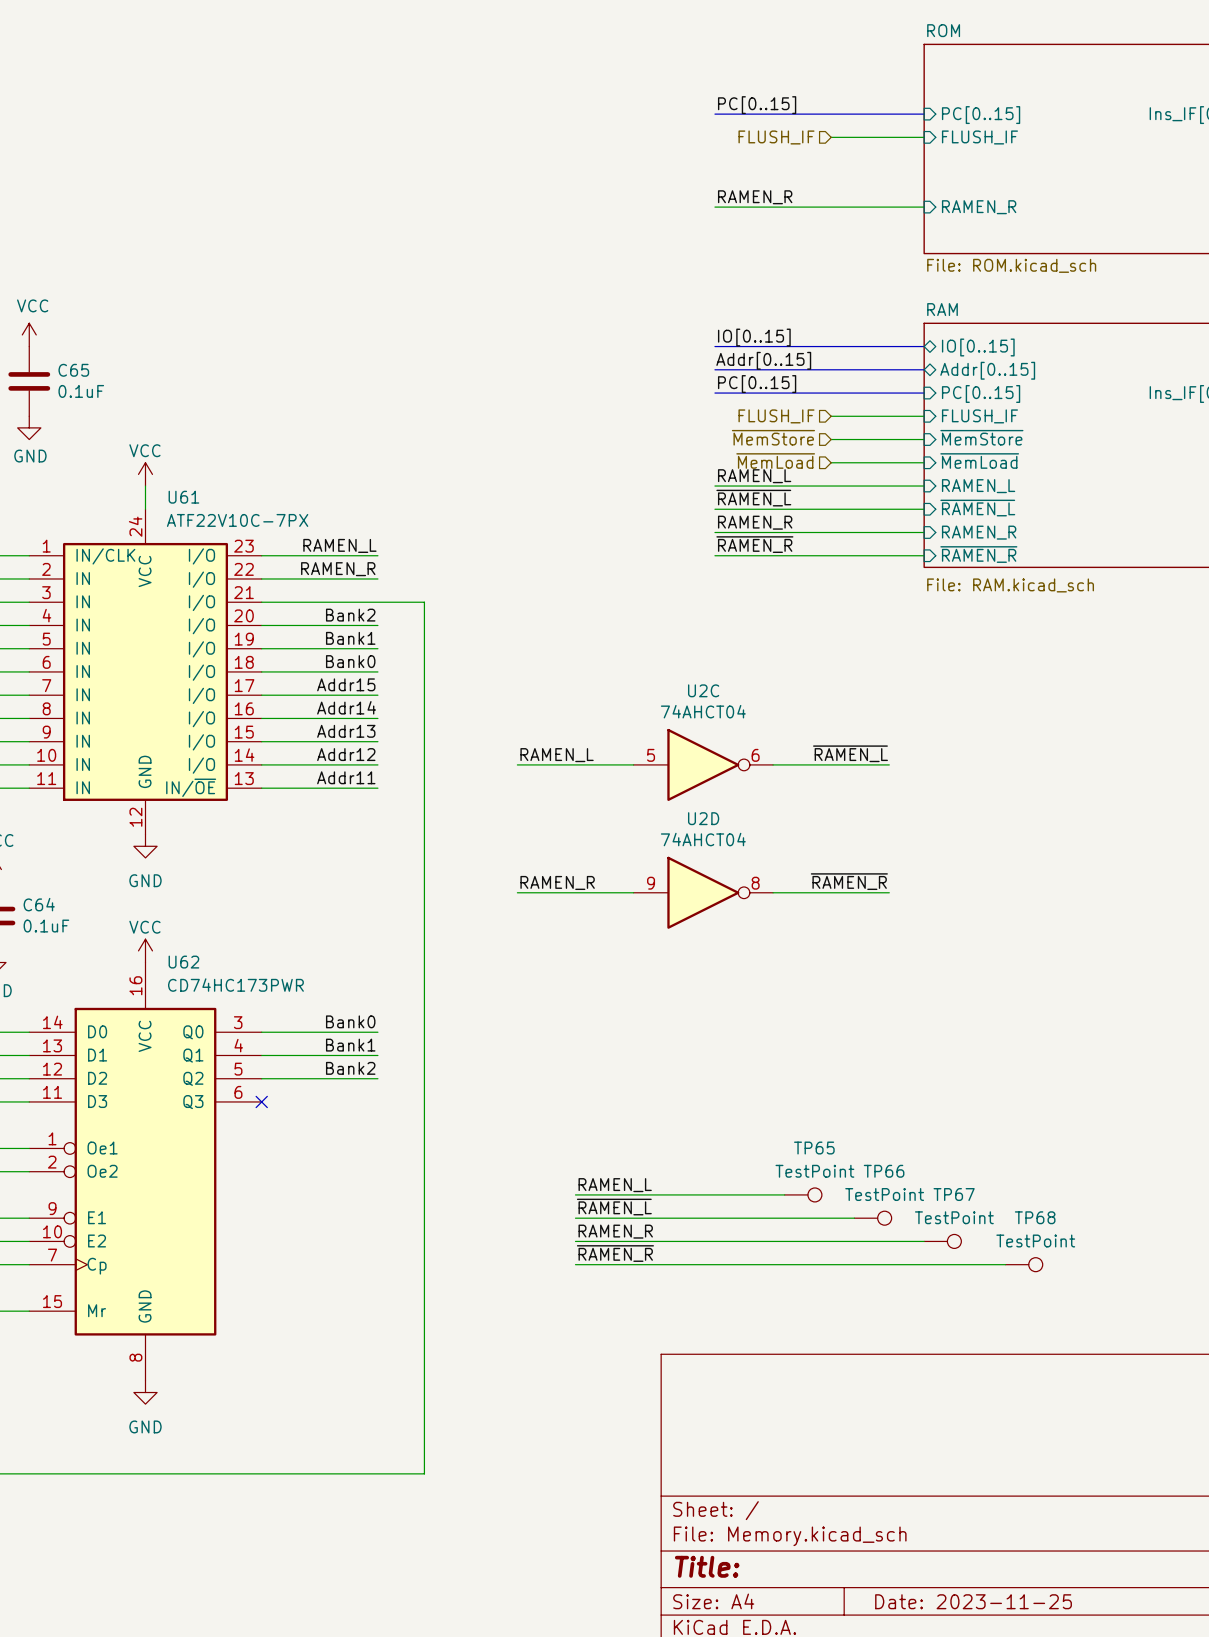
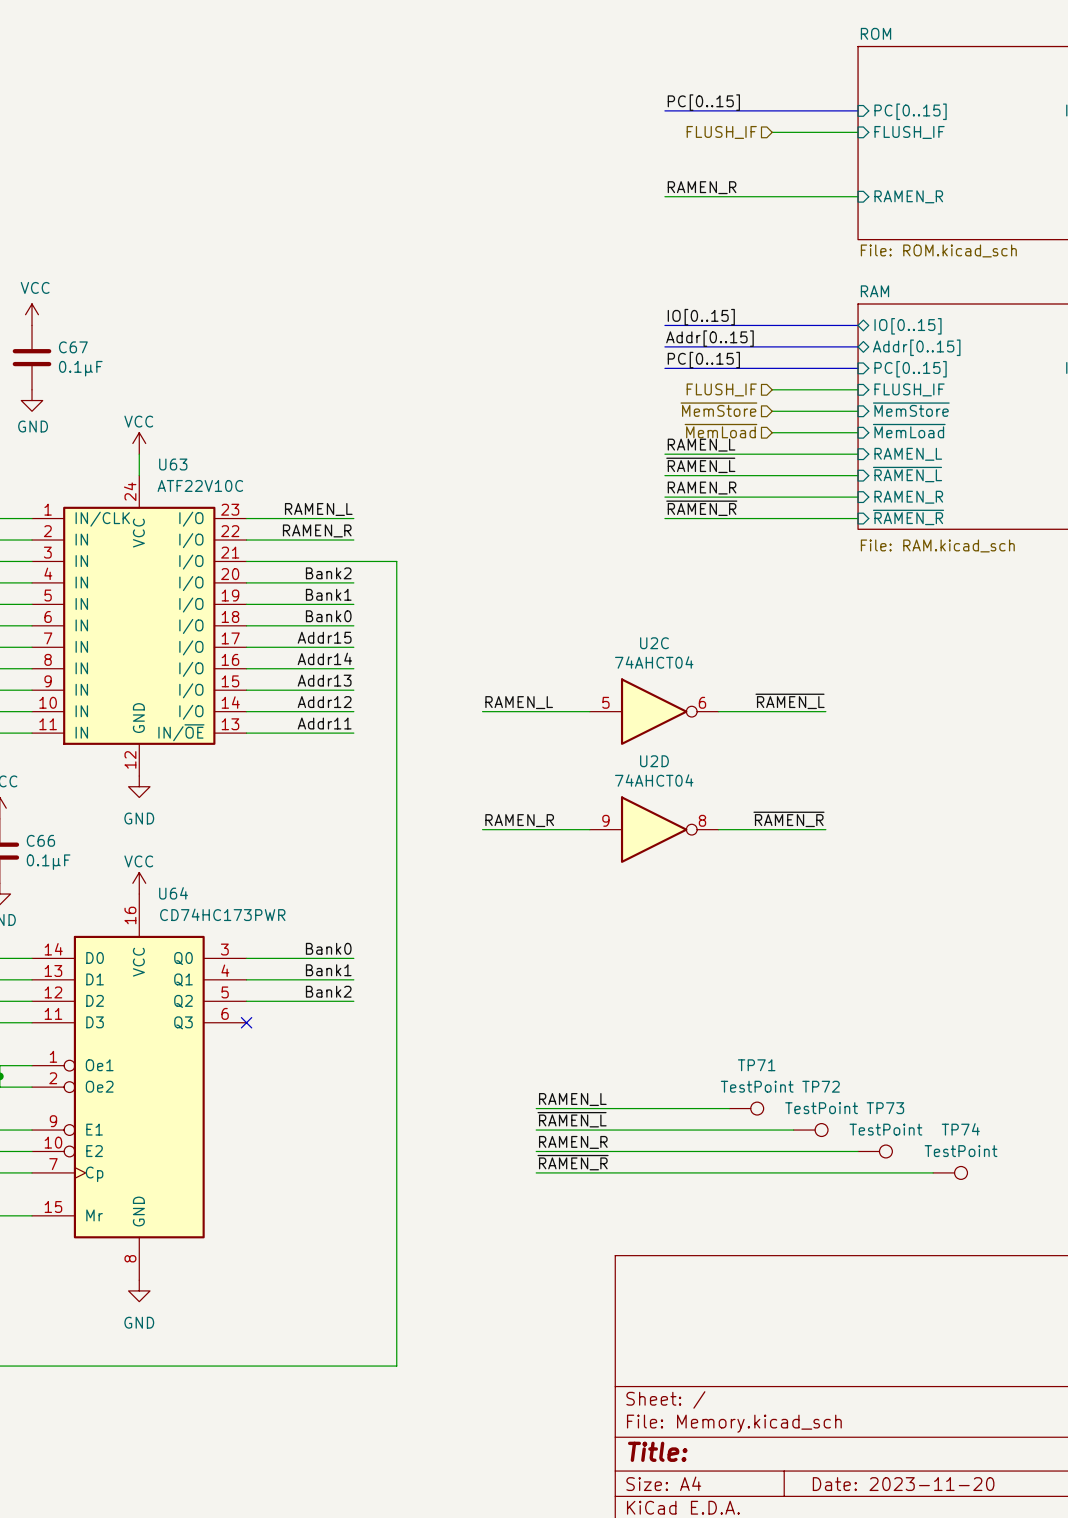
C65 name: C65 (73, 370) -> C67 (73, 347)
C65 value: 0.1uF (81, 391) -> 0.1μF (80, 368)
U61 name: U61 (183, 497) -> U63 (173, 464)
U61 value: ATF22V10C-7PX (237, 520) -> ATF22V10C (200, 485)
C64 name: C64 (39, 904) -> C66 (40, 840)
C64 value: 0.1uF (46, 926) -> 0.1μF (48, 862)
U62 name: U62 (183, 962) -> U64 (173, 893)
TP65 name: TP65 (814, 1148) -> TP71 (756, 1065)
TP66 name: TP66 (884, 1171) -> TP72 (821, 1086)
TP67 name: TP67 (954, 1194) -> TP73 (885, 1108)
TP68 name: TP68 (1035, 1217) -> TP74 (960, 1129)
title block: Date: 2023-11-25 (973, 1601) -> Date: 2023-11-20 (903, 1484)

